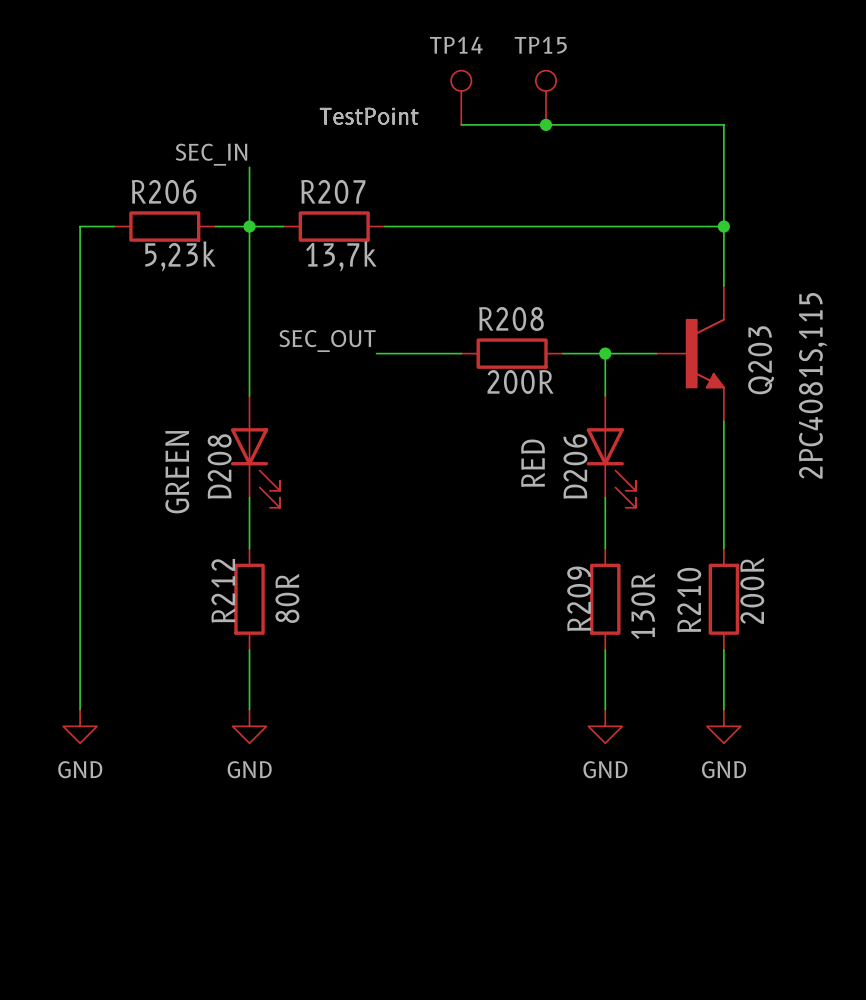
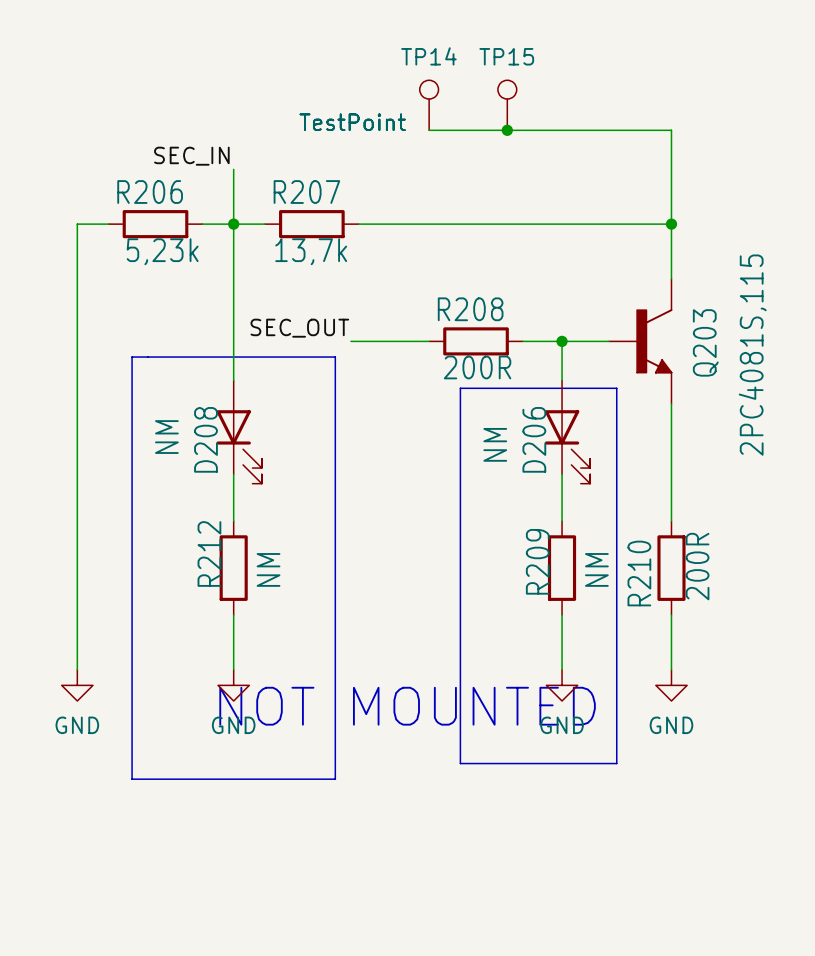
line: none -> (132, 357) (335, 357) (335, 779) (132, 779) (132, 357)
line: none -> (460, 388) (460, 763) (616, 763) (616, 388) (460, 388)
D206 value: RED (532, 463) -> NM (495, 444)
D208 value: GREEN (177, 472) -> NM (166, 437)
R212 value: 80R (287, 598) -> NM (268, 569)
R209 value: 130R (643, 606) -> NM (596, 569)
text: none -> NOT MOUNTED (407, 706)

